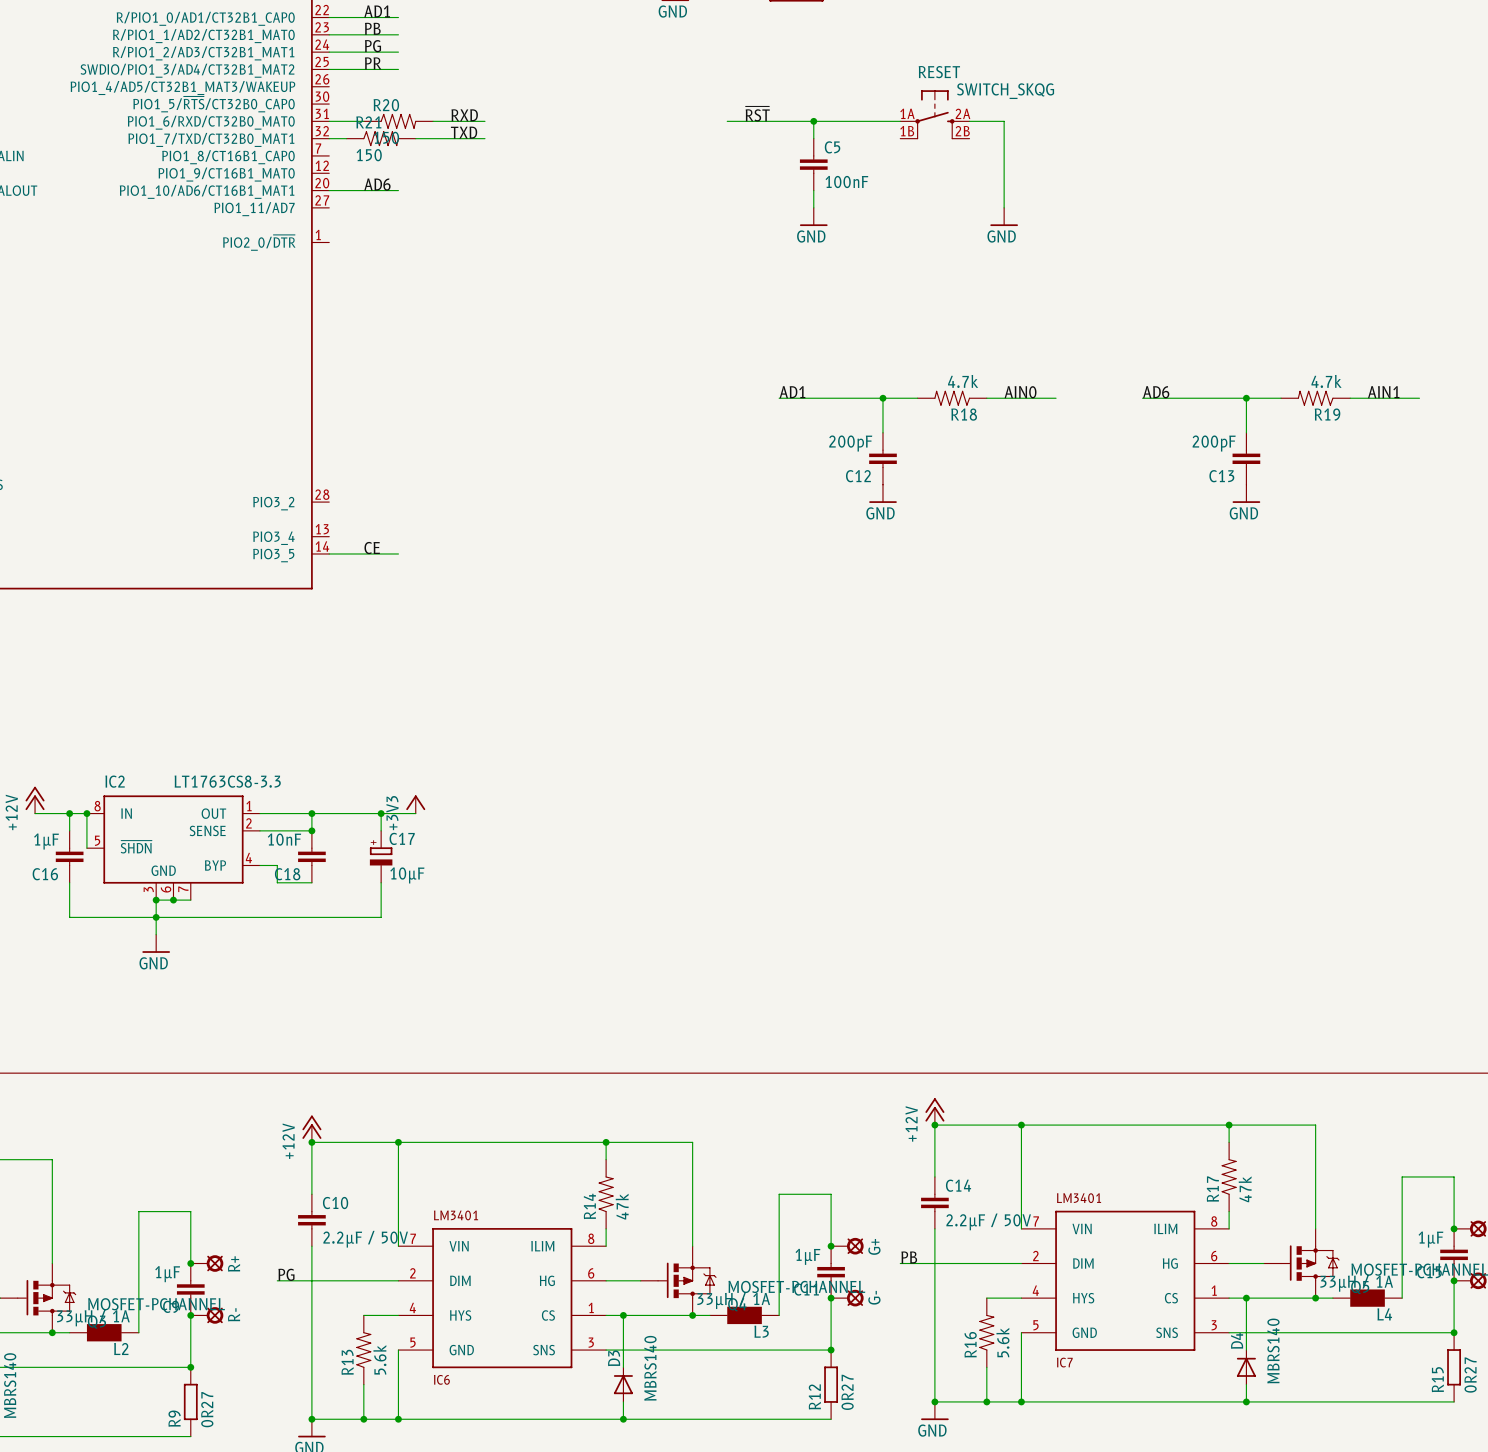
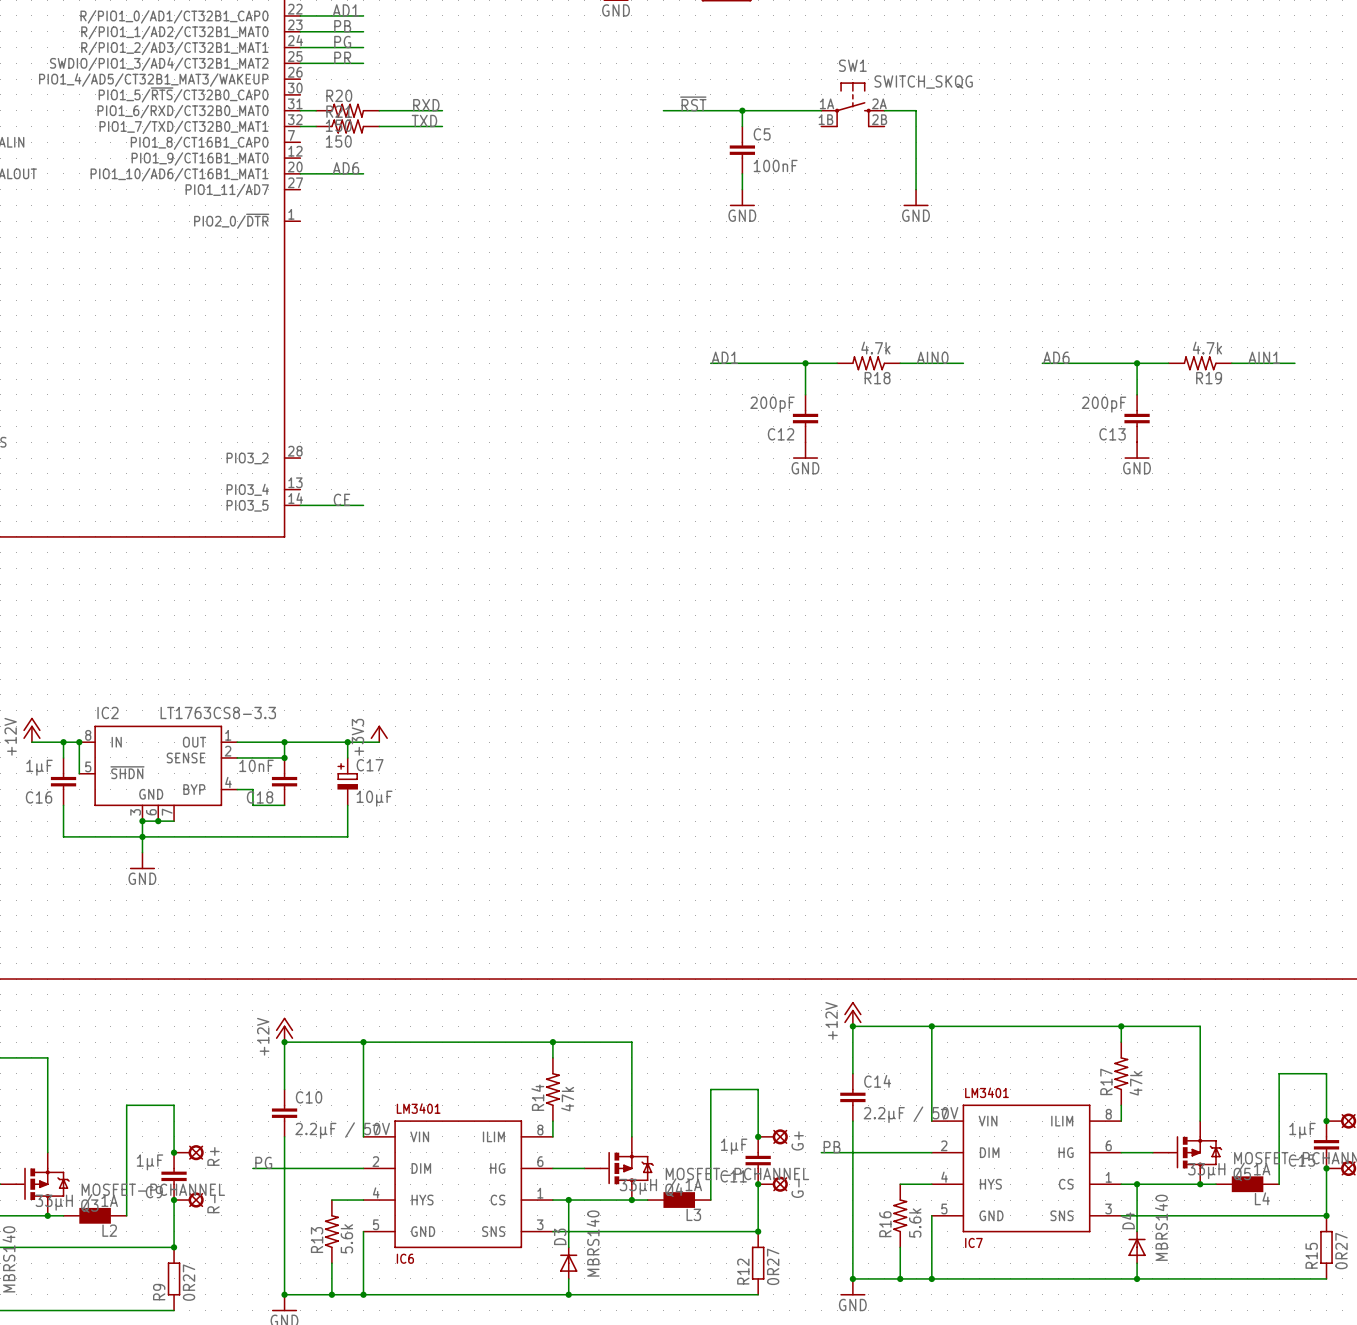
RESET name: RESET (939, 72) -> SW1 (852, 65)
R20 symbol: [363, 113, 434, 129] -> [316, 103, 380, 118]

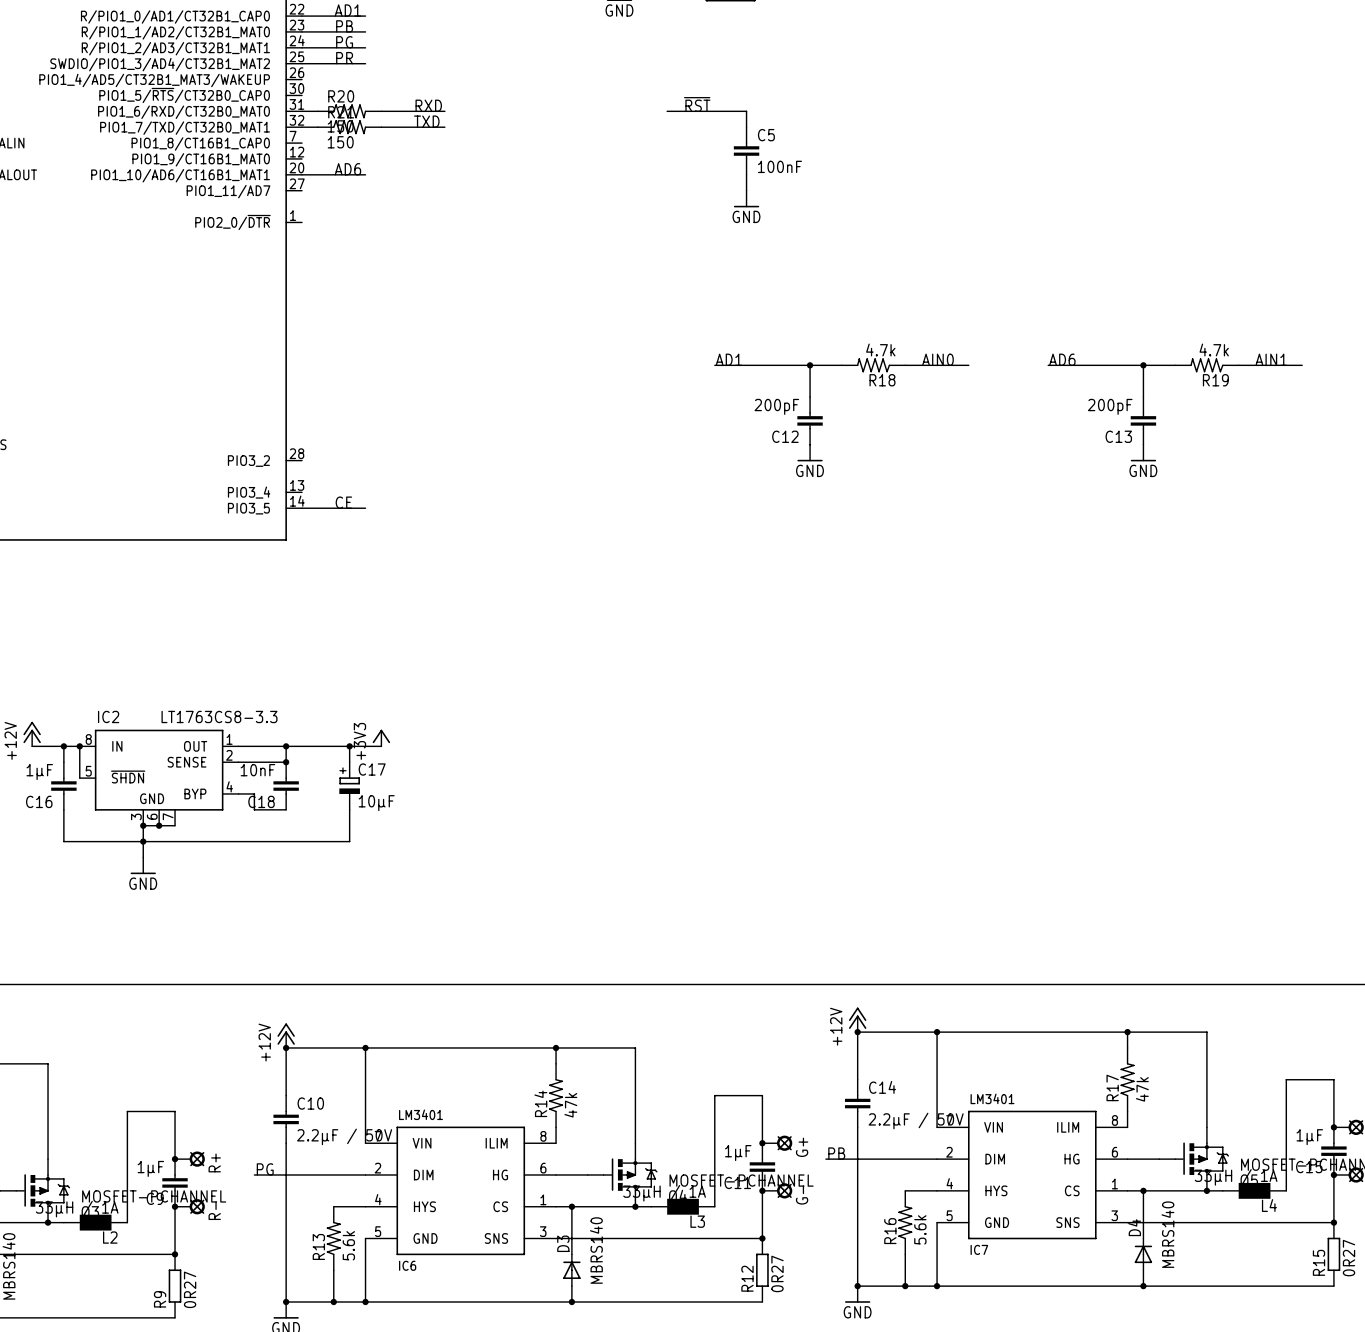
SW1: SWITCH_SKQG (852, 104) -> none
wire: (742, 110) (821, 110) -> none
junction: (742, 110) -> none
wire: (884, 110) (916, 110) (916, 189) -> none
power symbol: GND (916, 197) -> none

